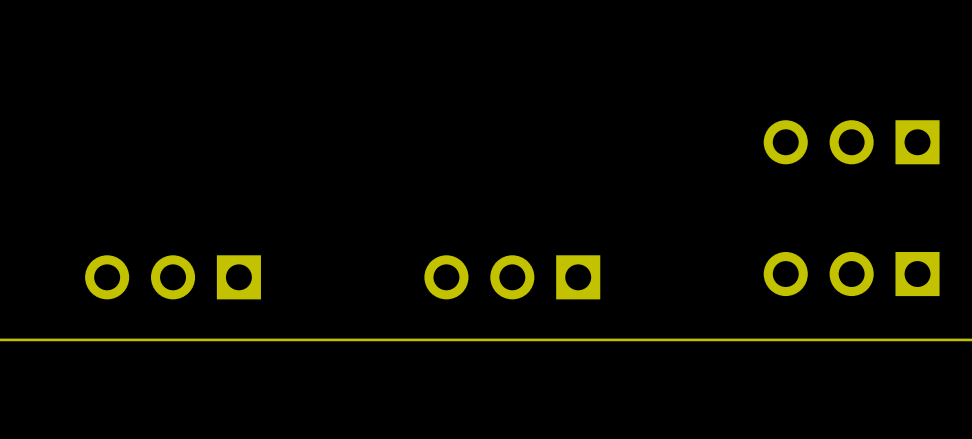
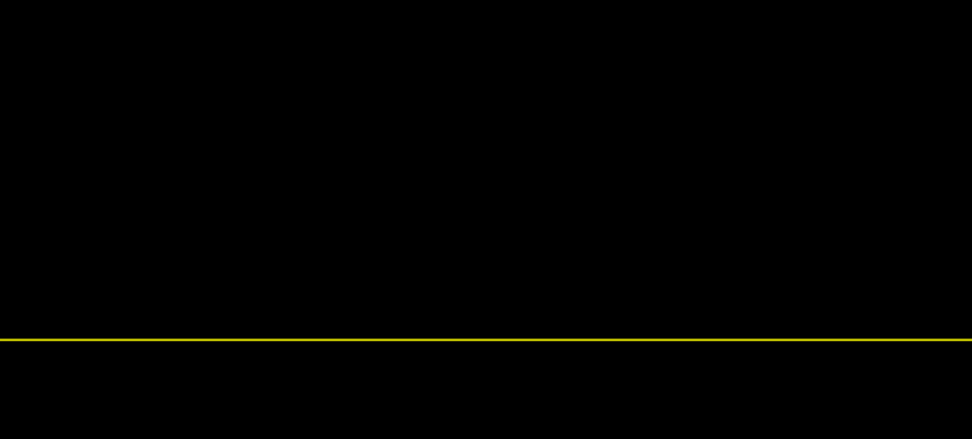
part: (851, 142) -> none
part: (851, 274) -> none
part: (173, 277) -> none
part: (512, 277) -> none

